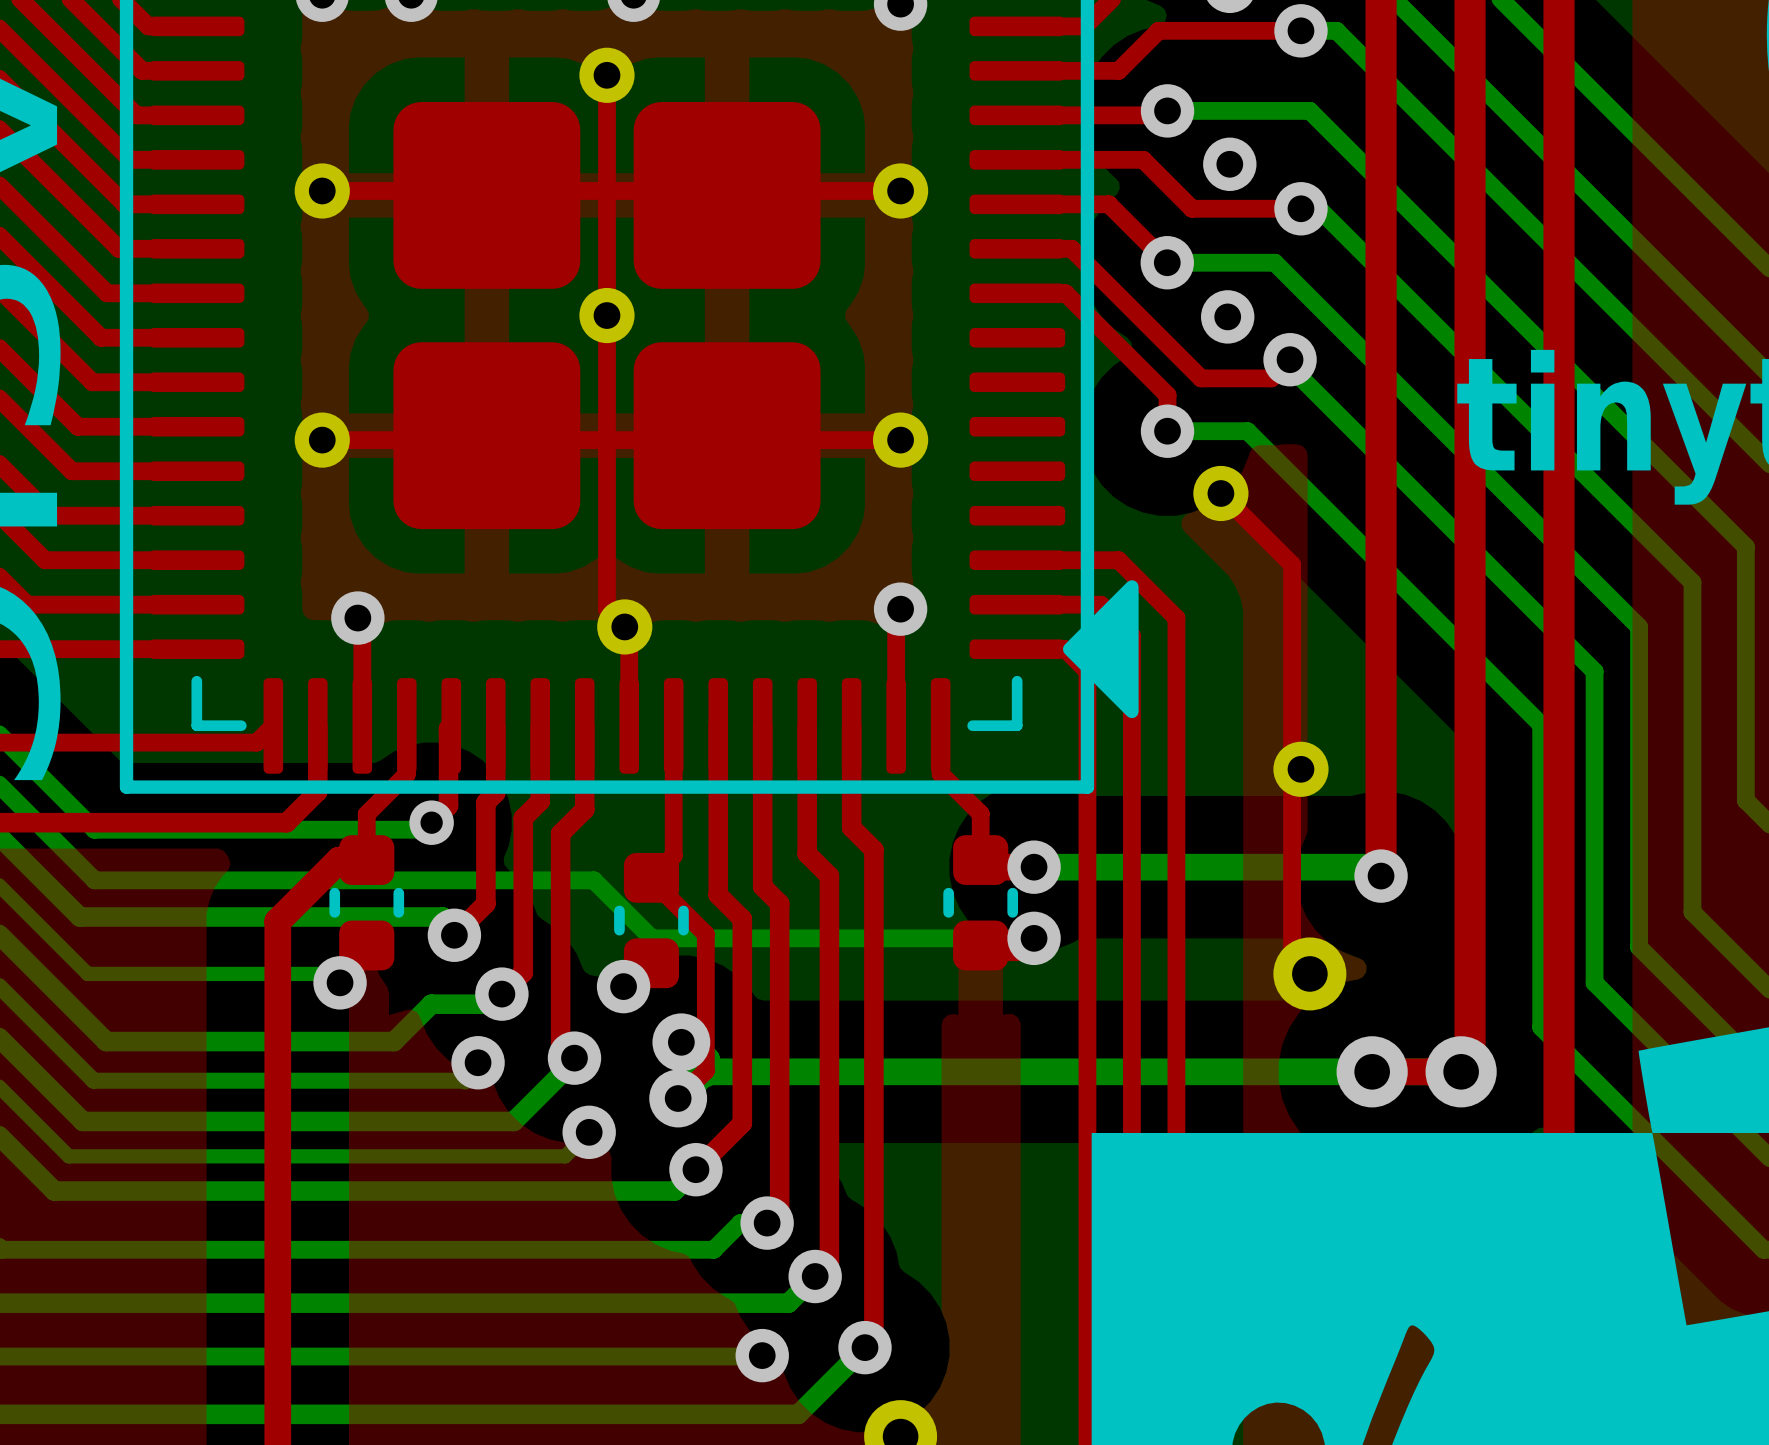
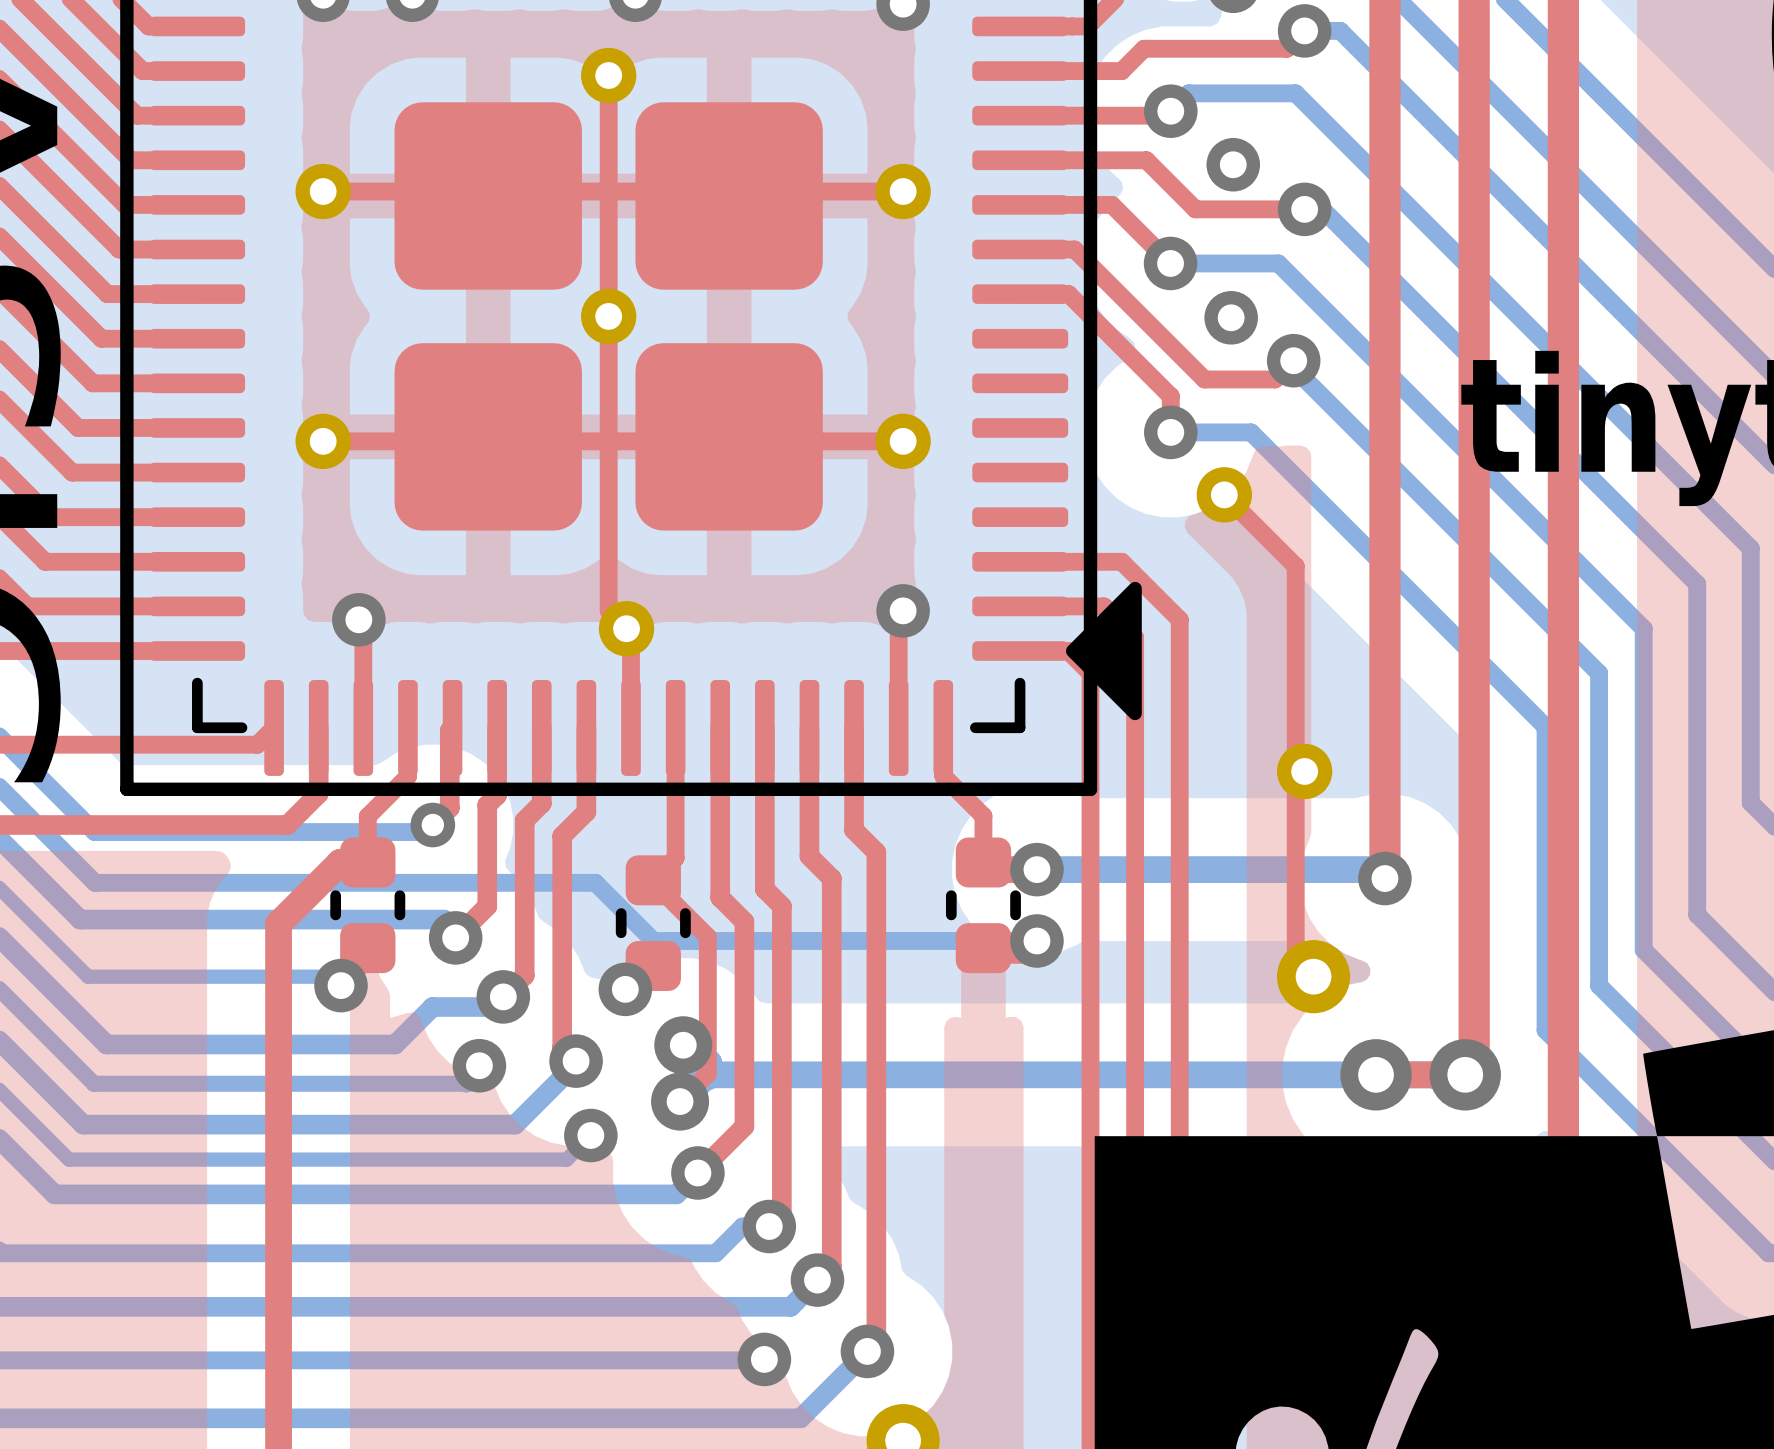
top track: (1300, 30) (1158, 30) (1140, 48) -> (1304, 30) (1286, 48) (1144, 48)
bottom track: (1167, 110) (1309, 110) -> (1170, 111) (1188, 93) (1295, 93) (1313, 111)

